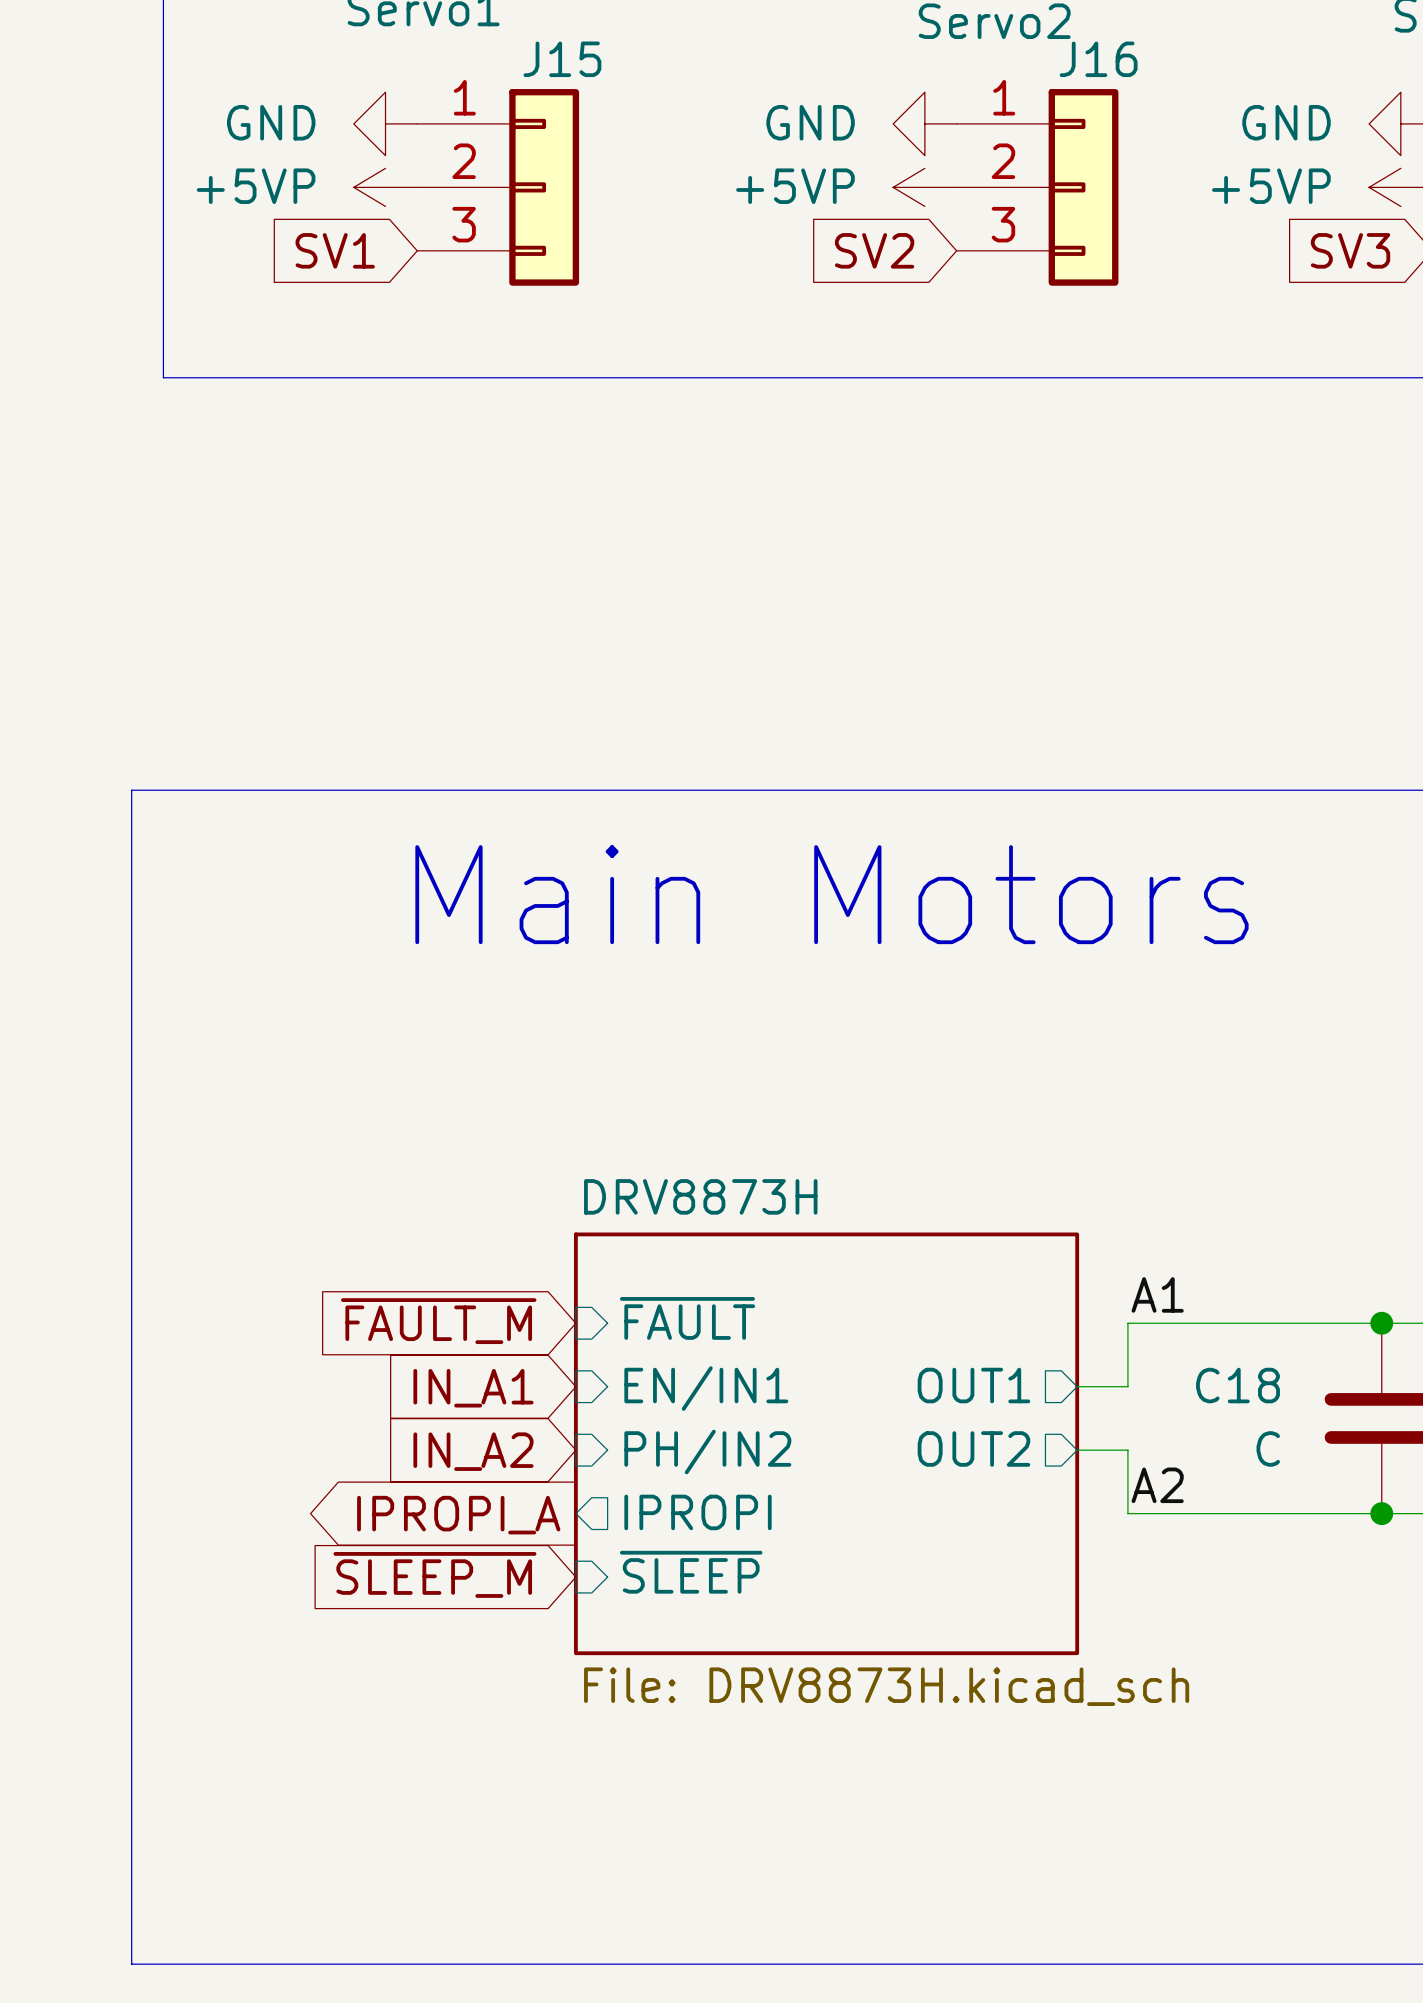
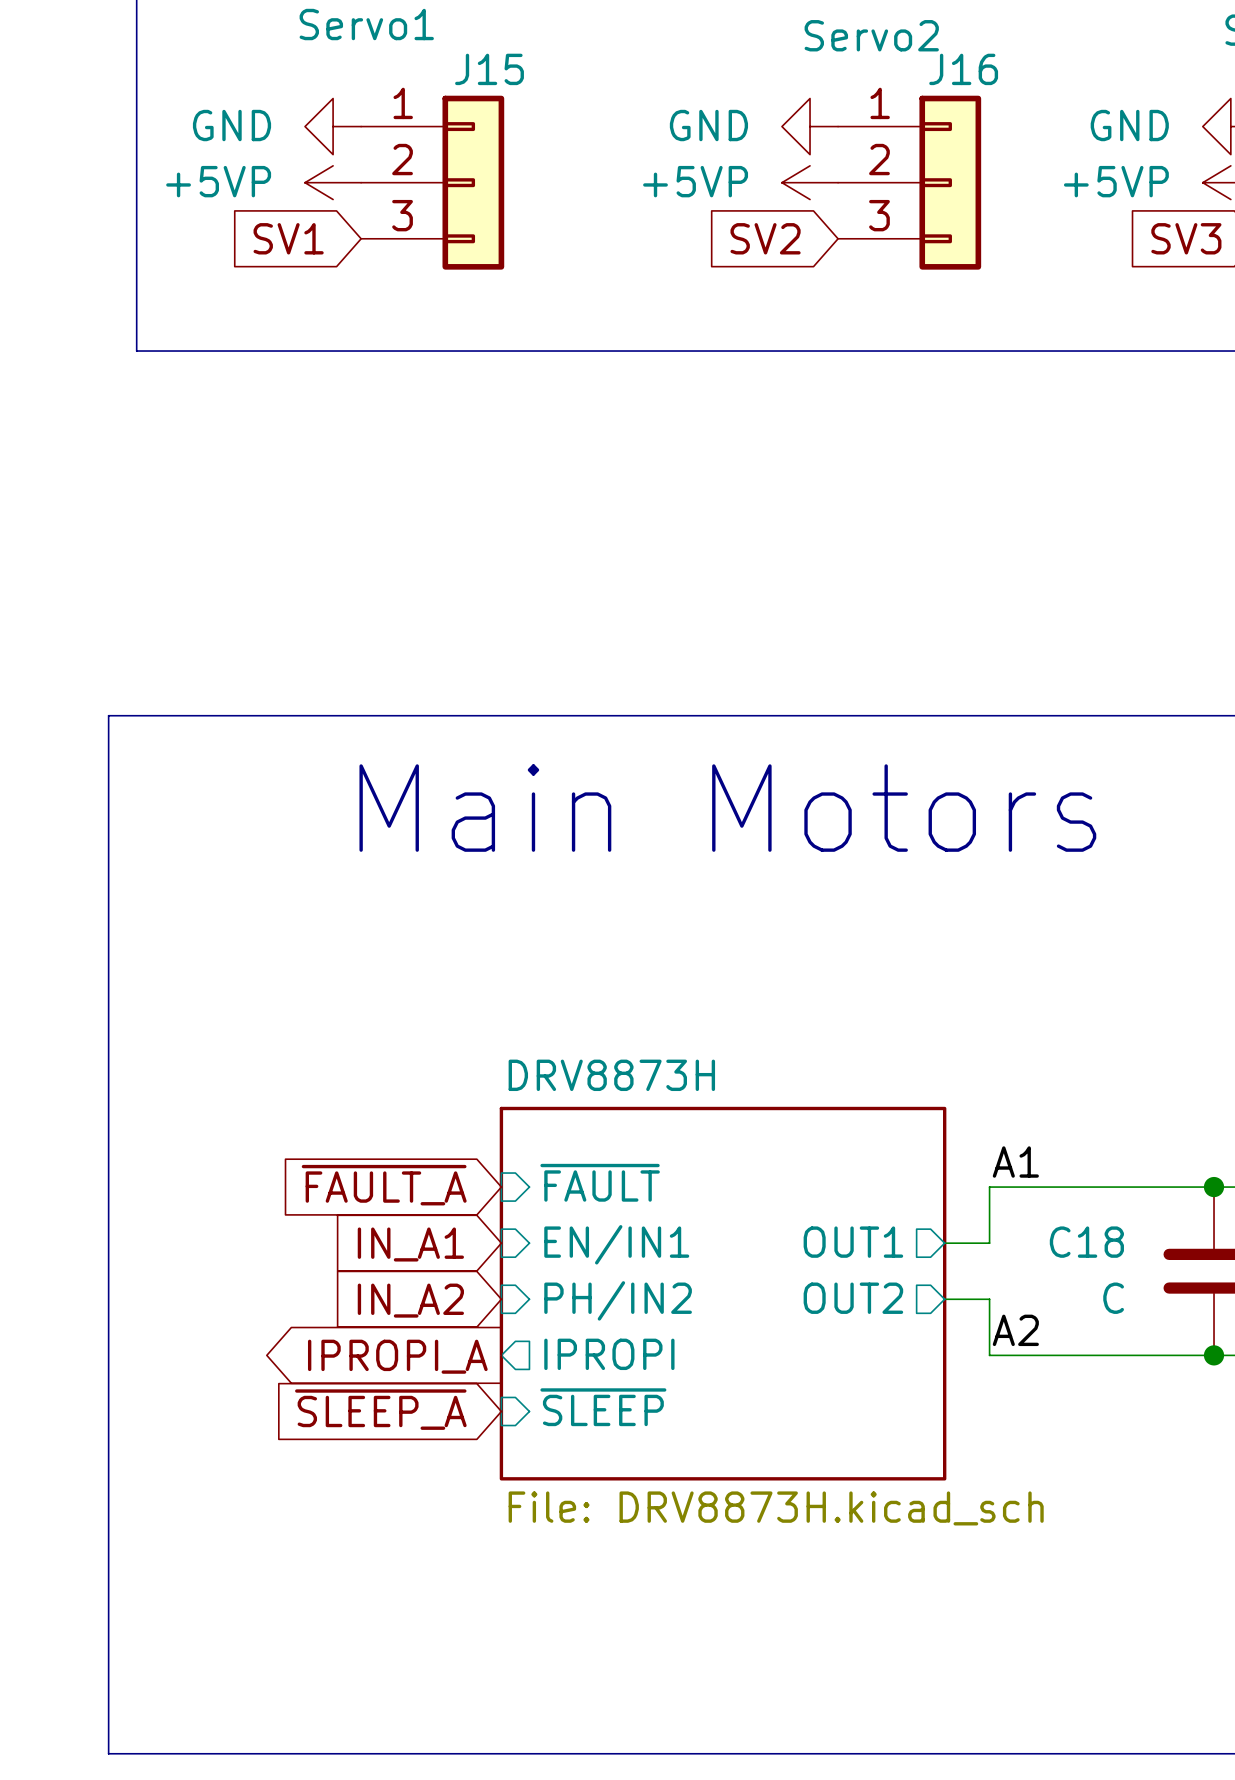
global label: ~{FAULT_M} (438, 1321) -> ~{FAULT_A} (384, 1185)
global label: ~{SLEEP_M} (434, 1574) -> ~{SLEEP_A} (380, 1409)

